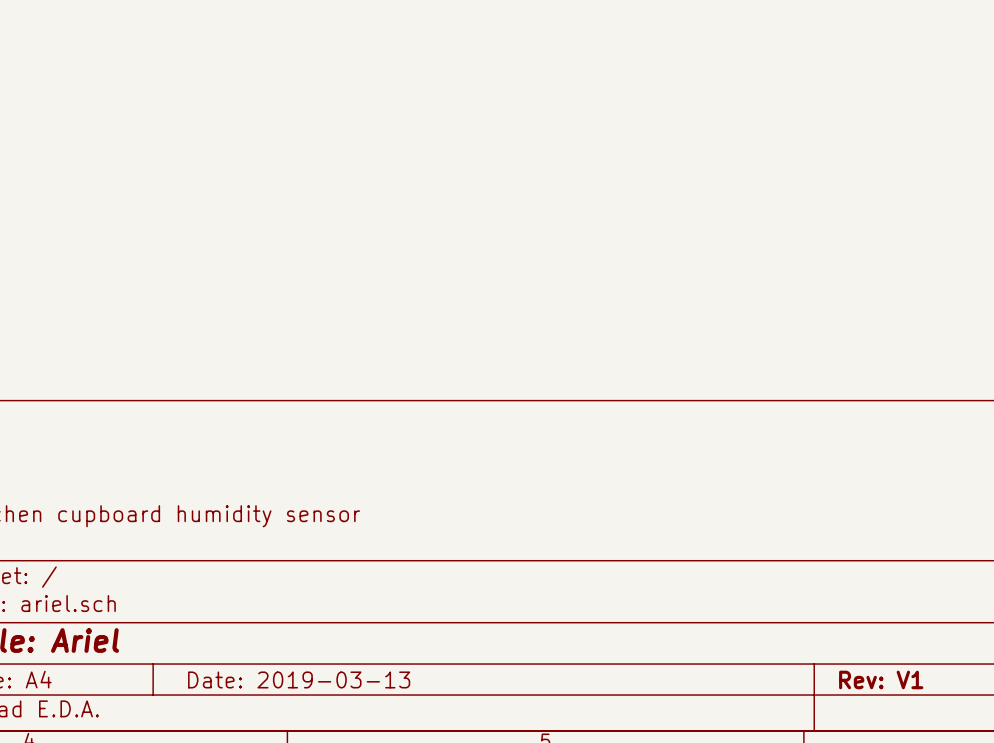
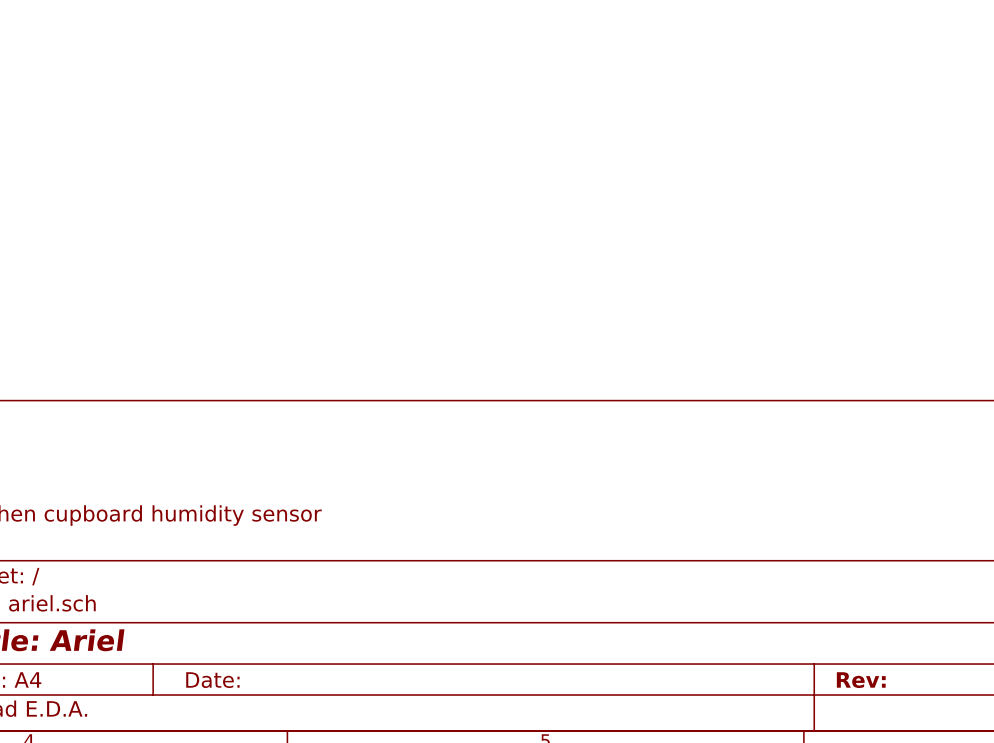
title block: Date: 2019-03-13 (299, 679) -> Date: (212, 680)
title block: Rev: V1 (881, 679) -> Rev: (861, 680)

